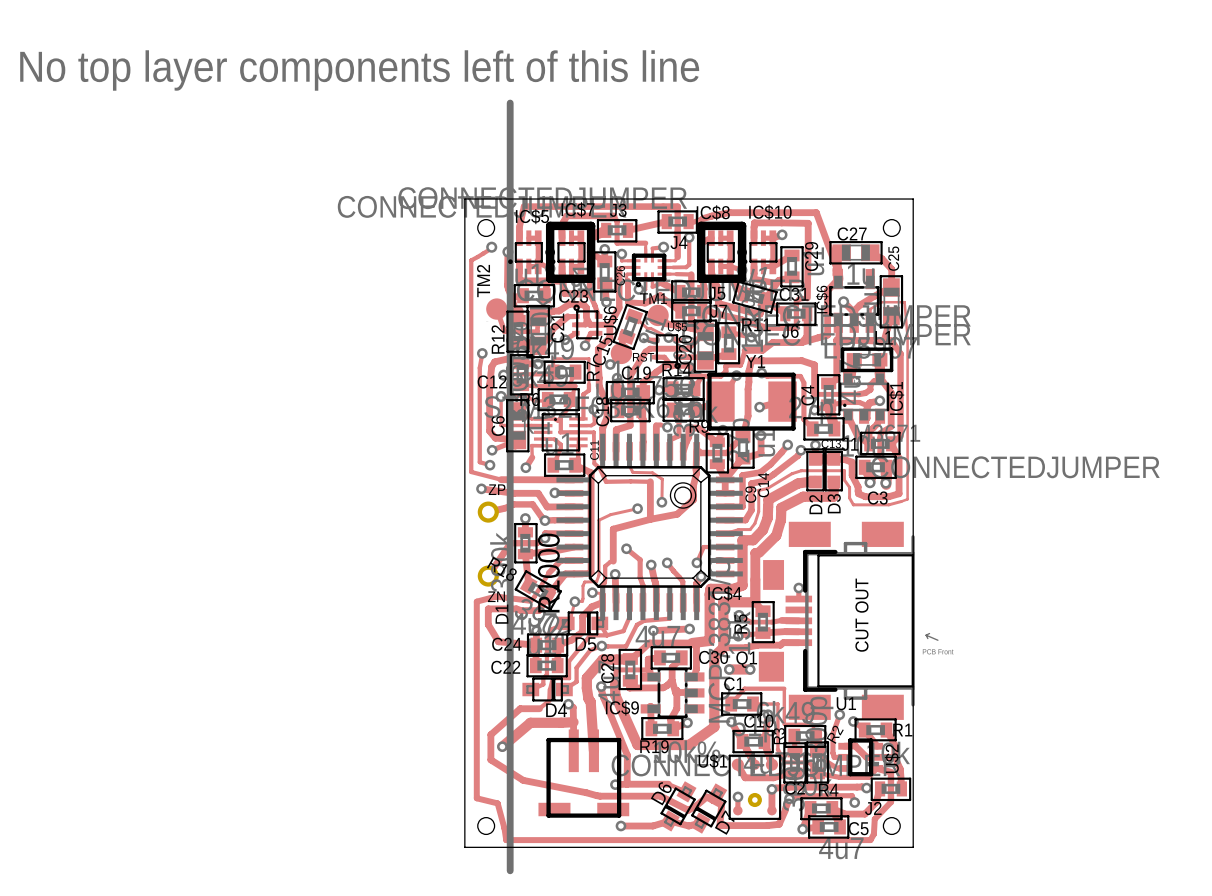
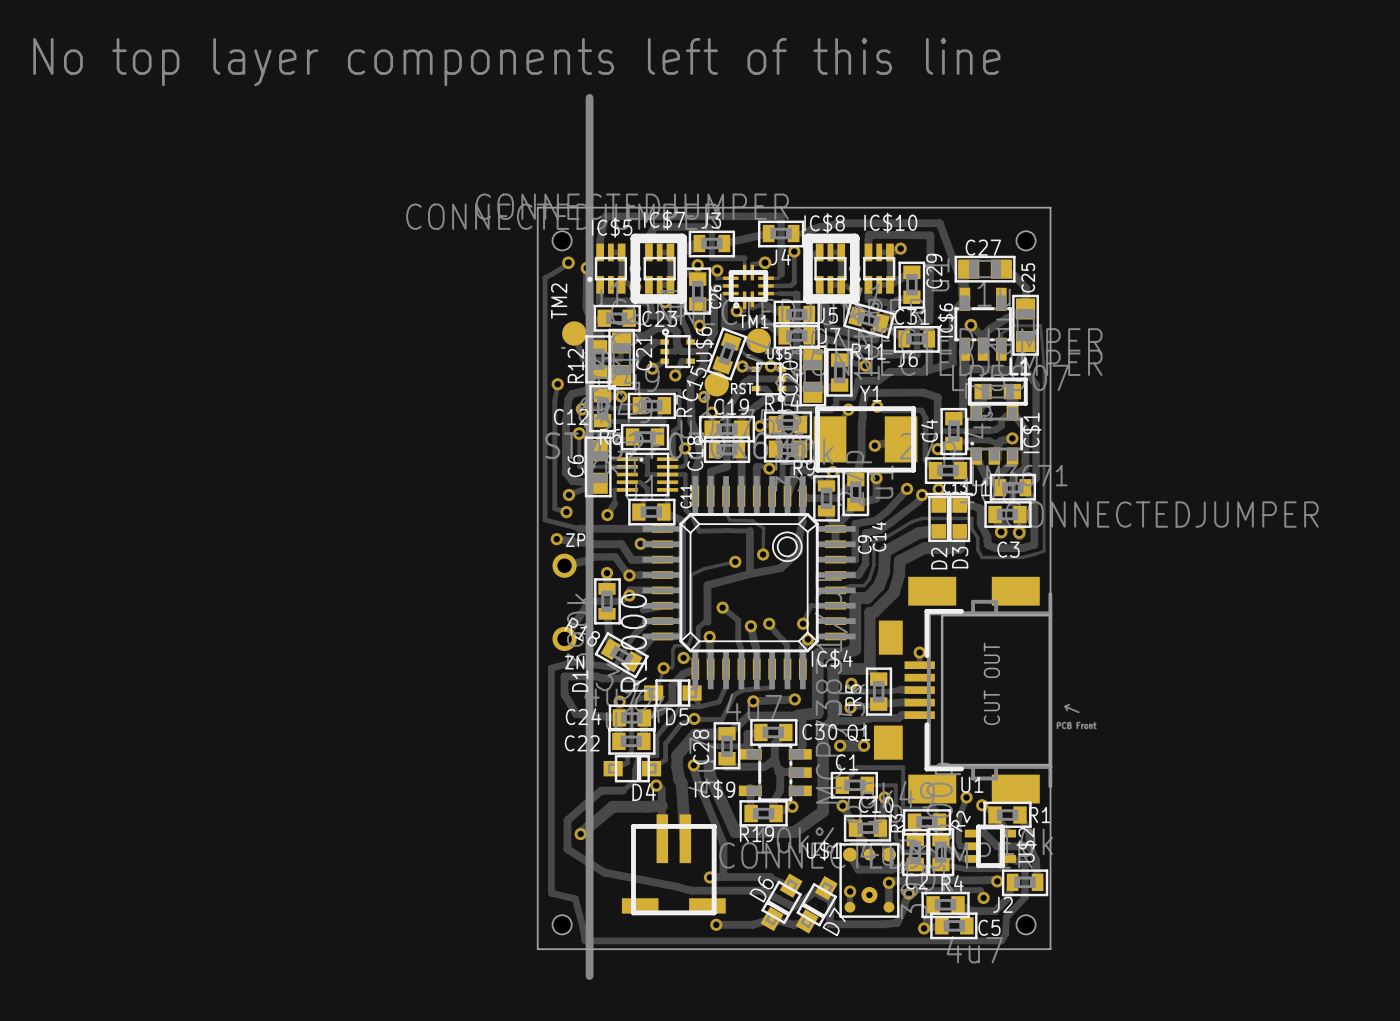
track: (557, 550) (525, 554) -> none

